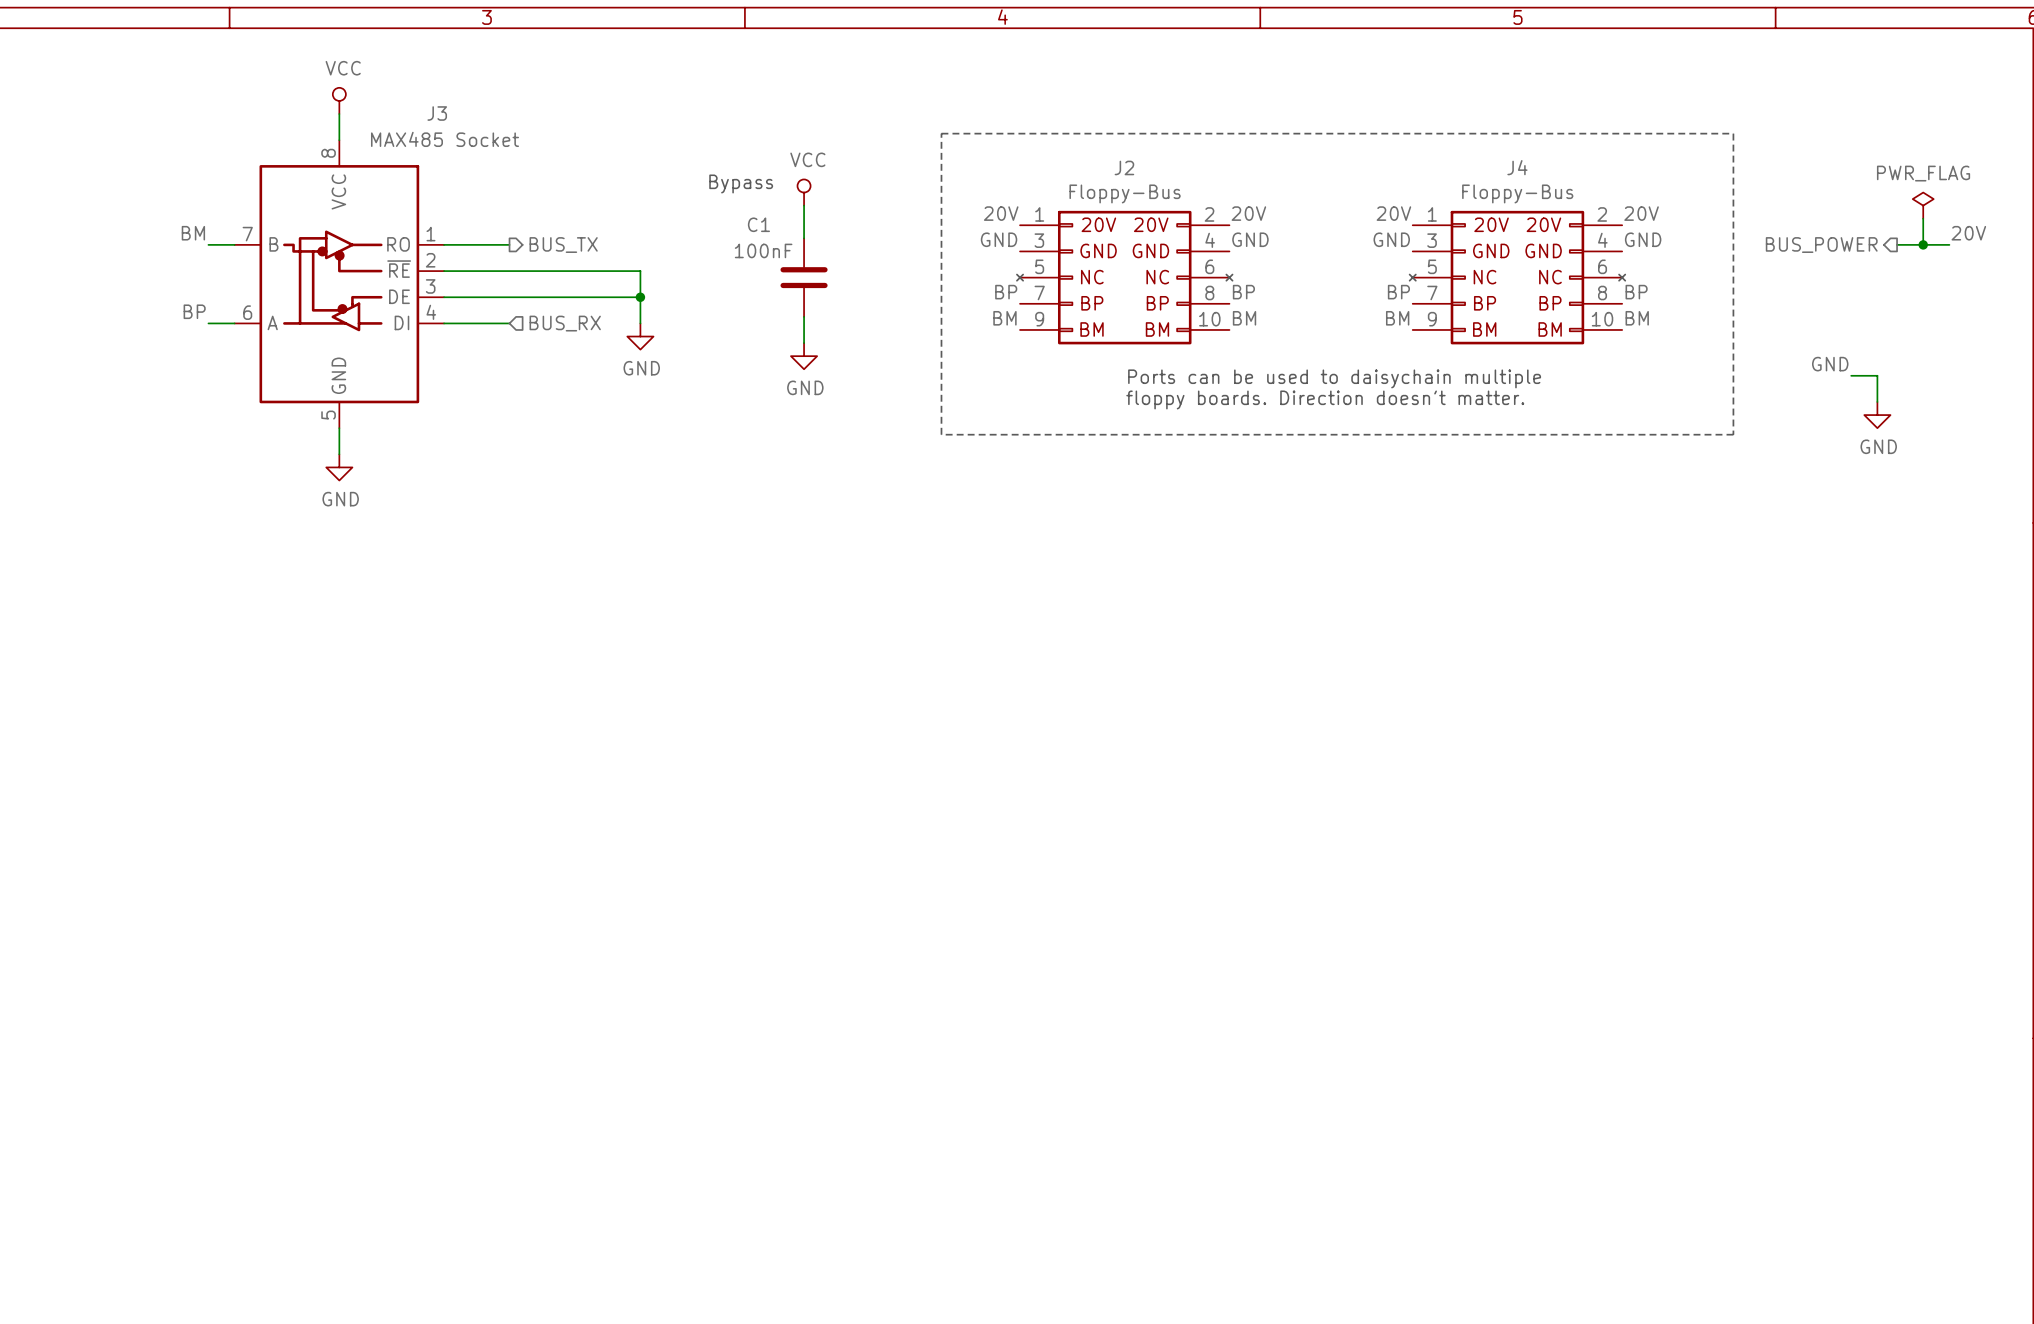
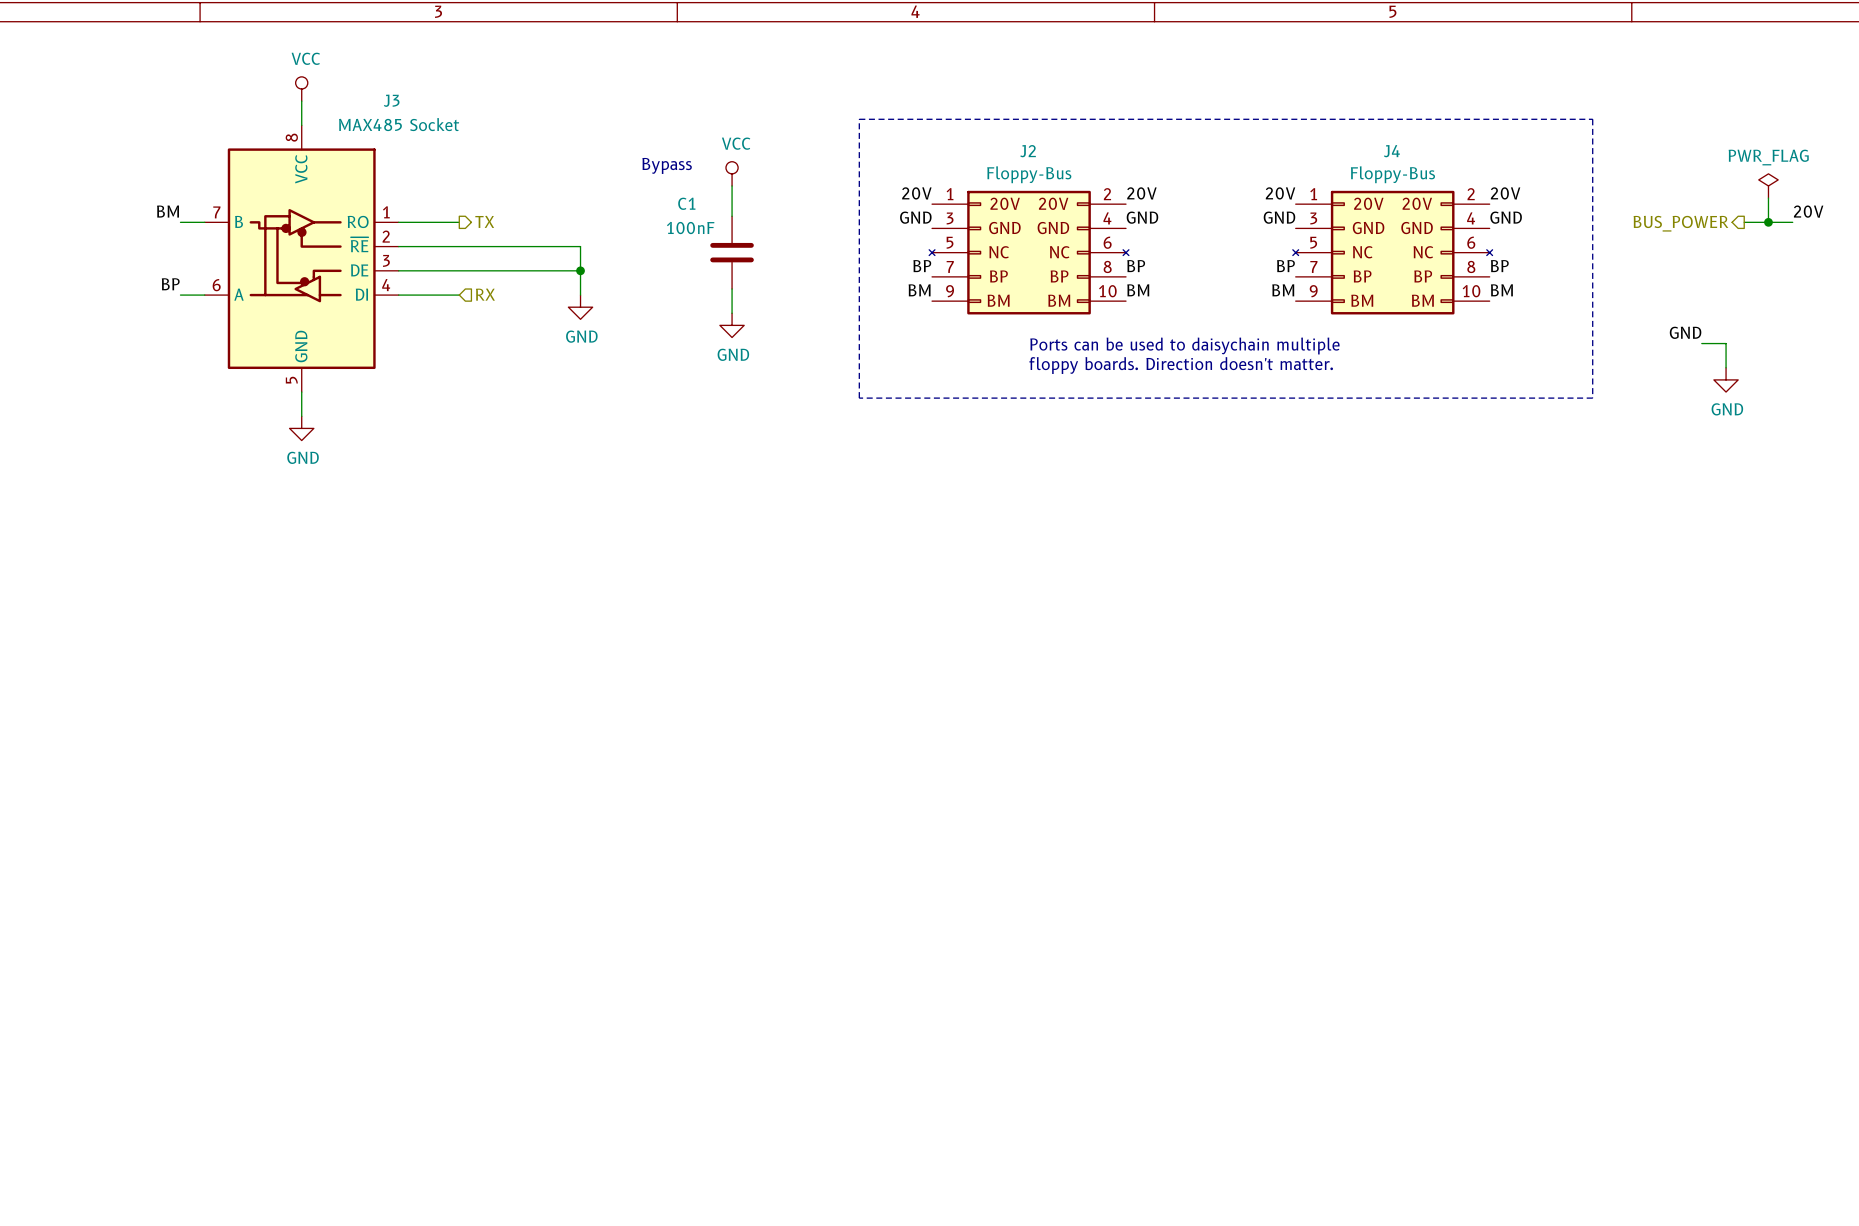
hierarchical label: BUS_TX (563, 245) -> TX (484, 221)
hierarchical label: BUS_RX (565, 323) -> RX (485, 294)

